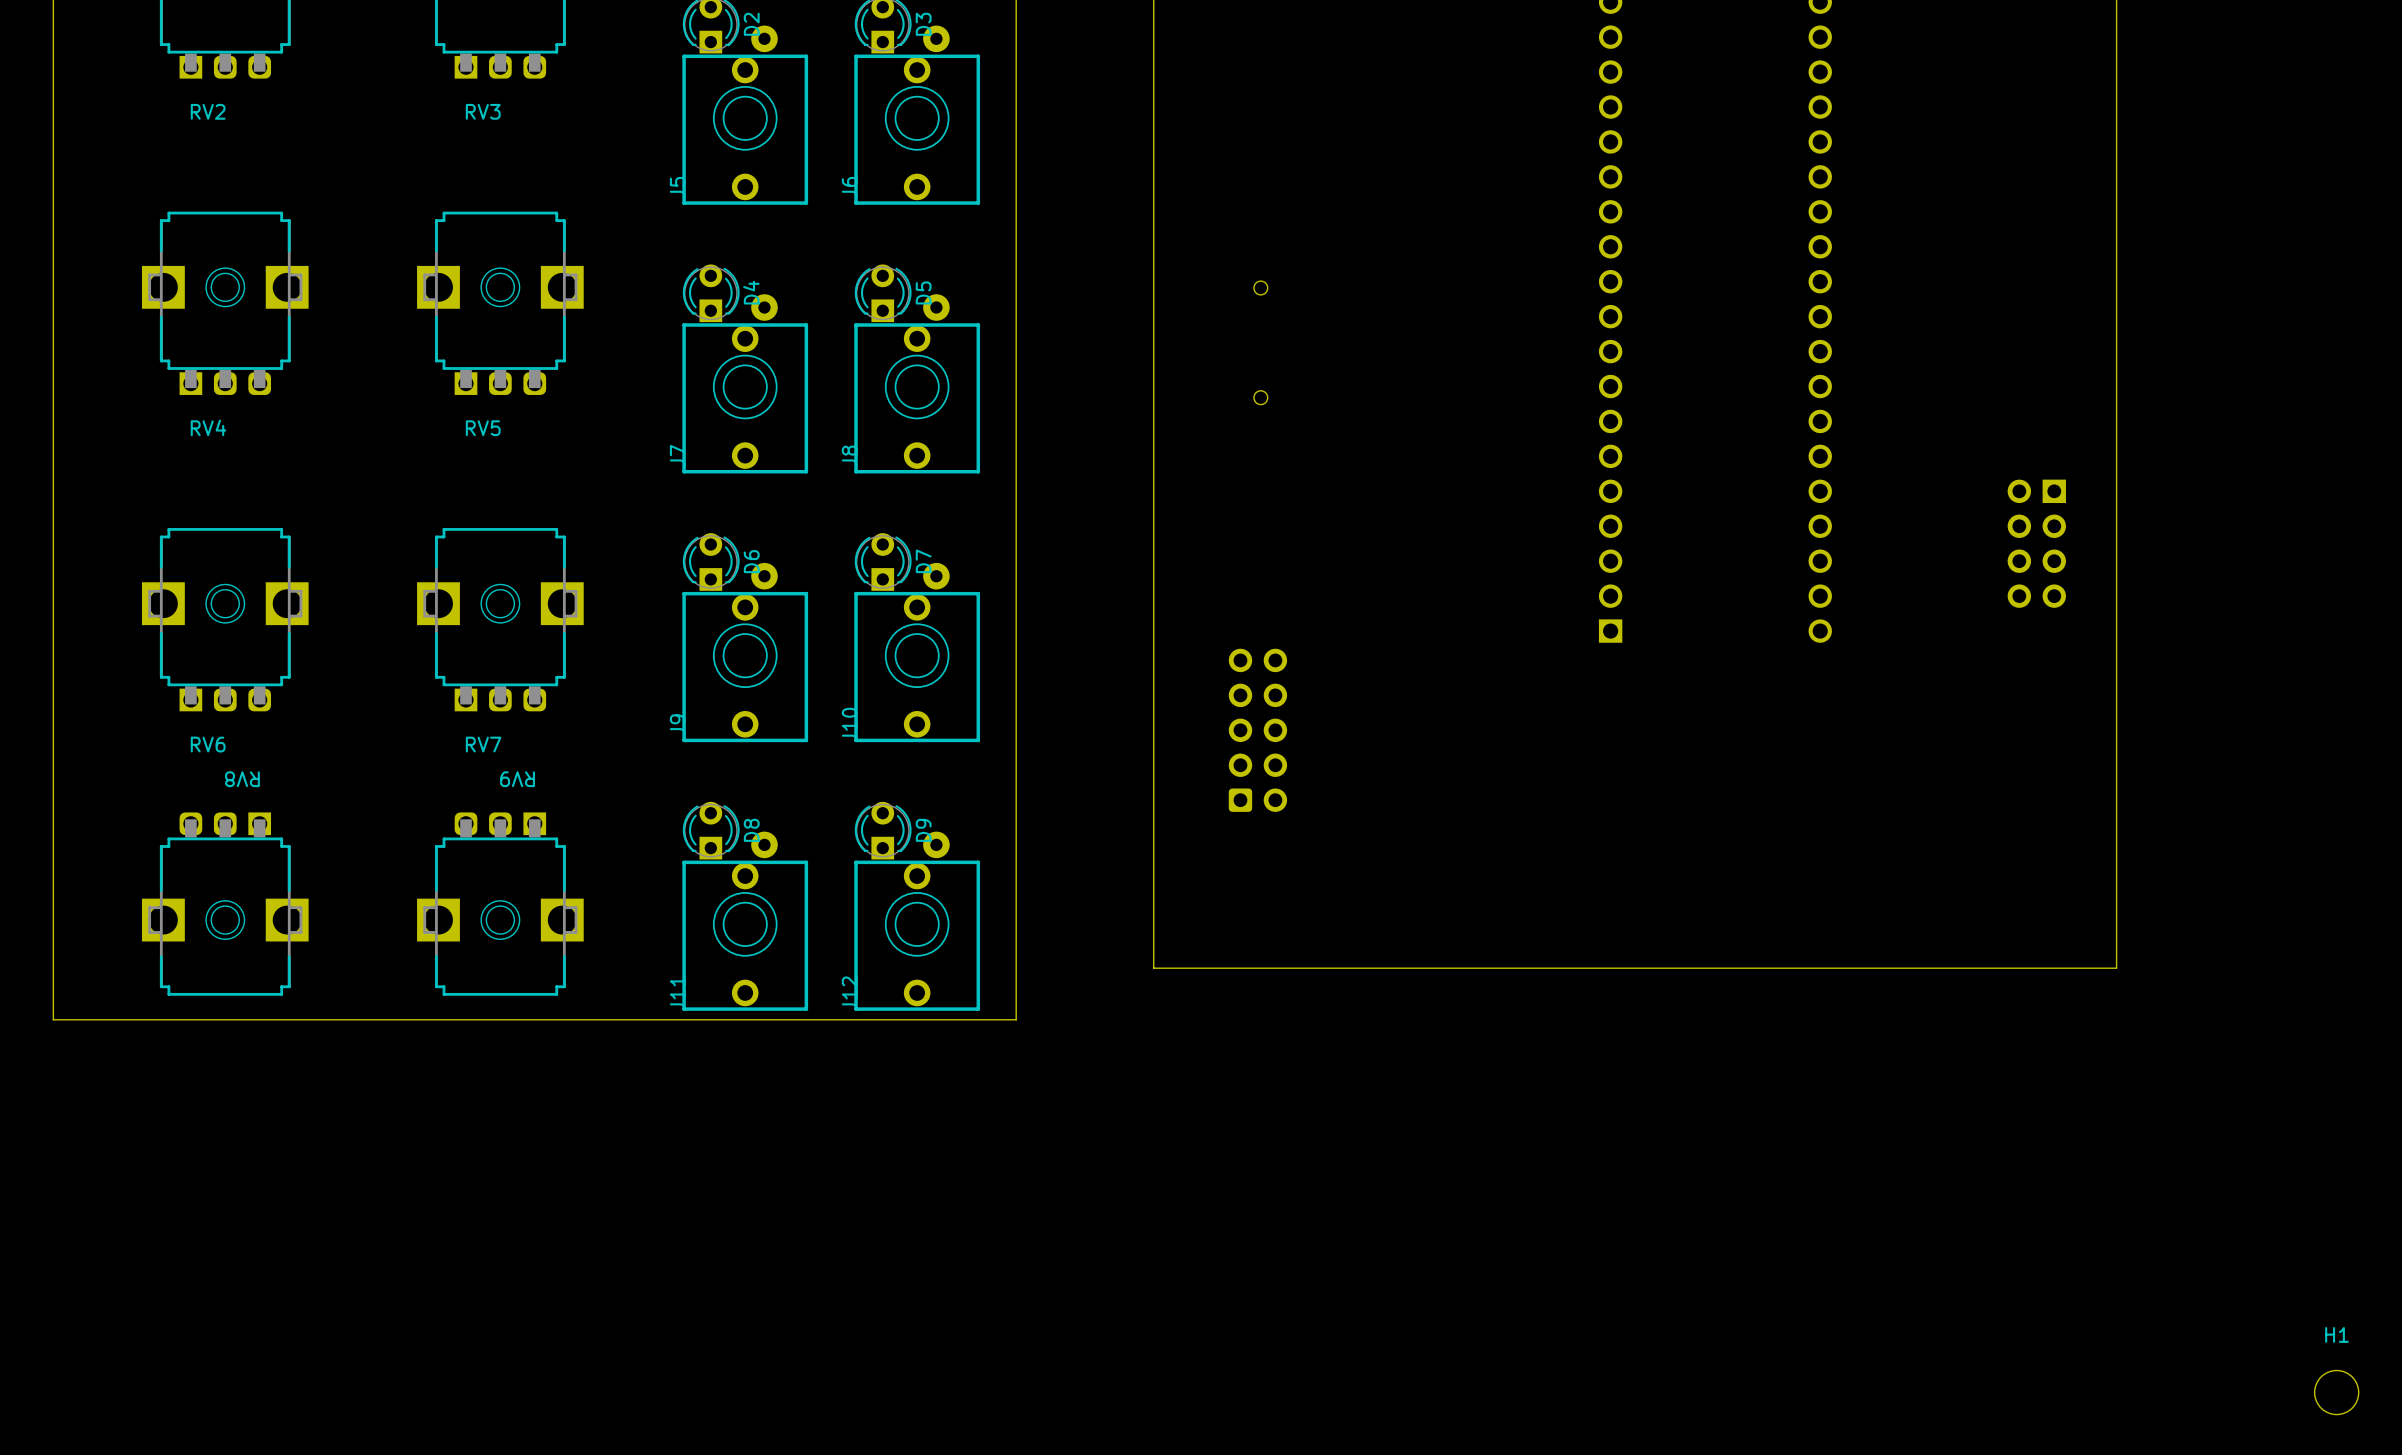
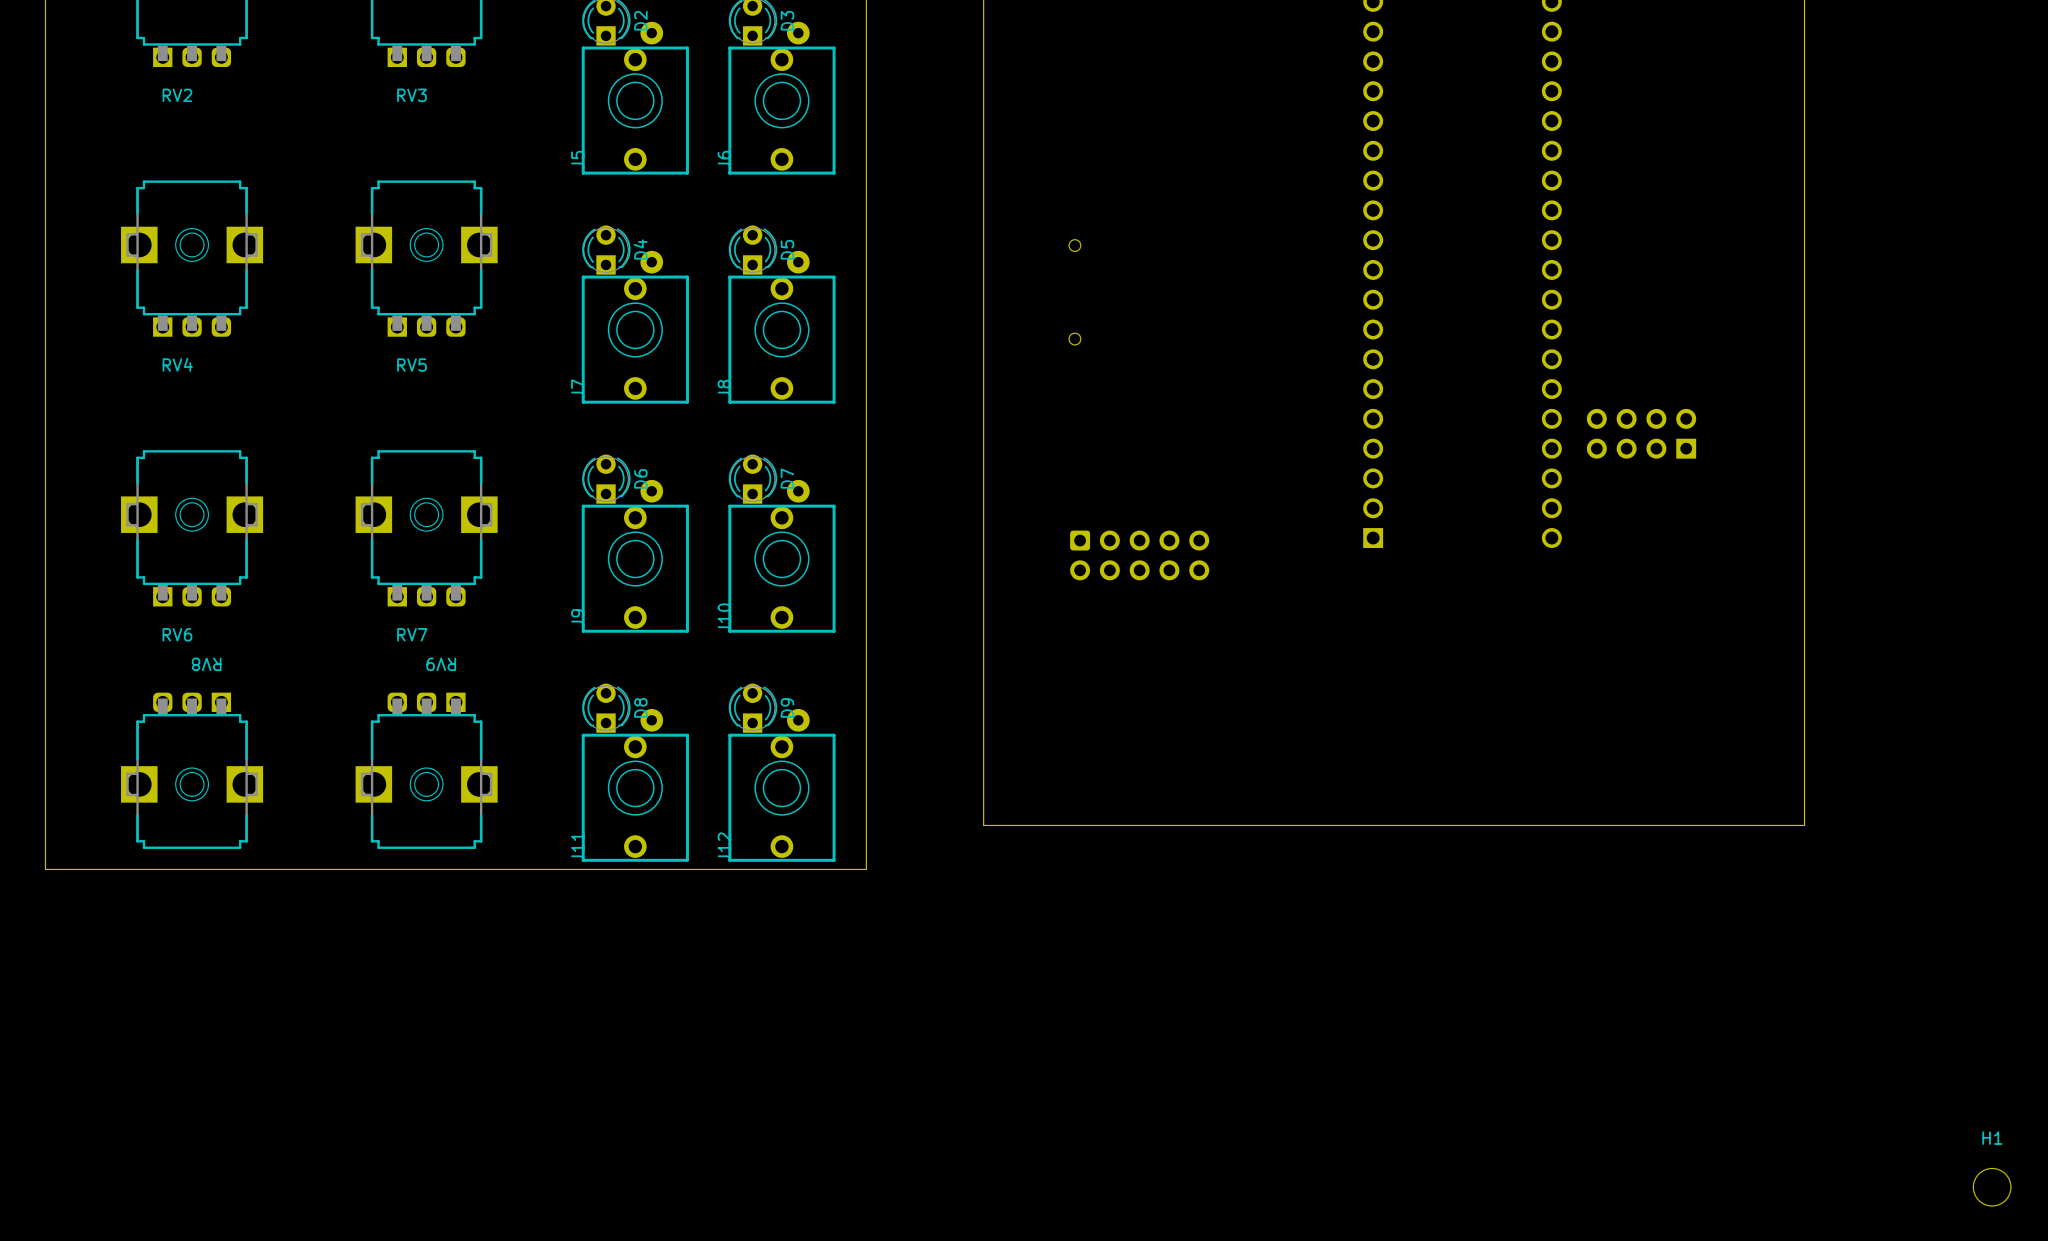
part rotation: 0° (2036, 543) -> 90° clockwise (1641, 433)
part position: (2036, 543) -> (1641, 433)
part rotation: 0° (1257, 730) -> 90° clockwise (1139, 555)
part position: (1257, 730) -> (1139, 555)

